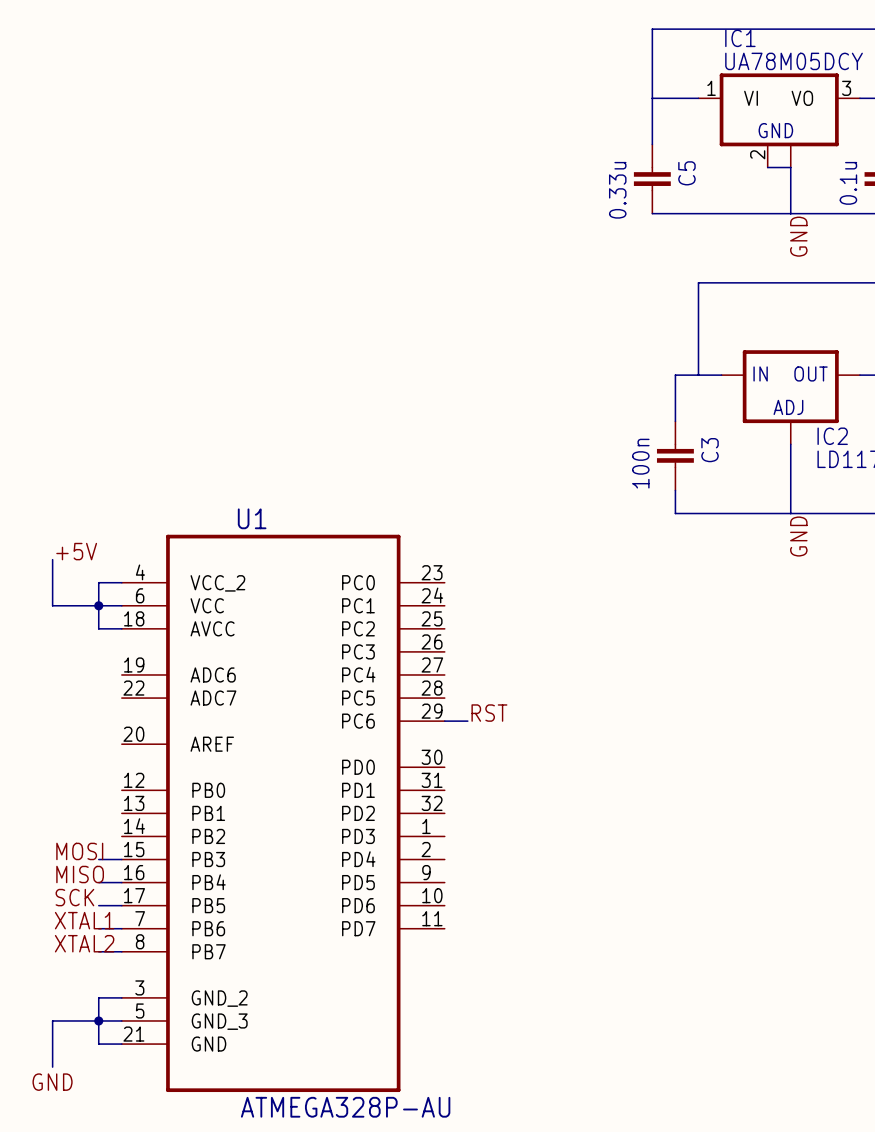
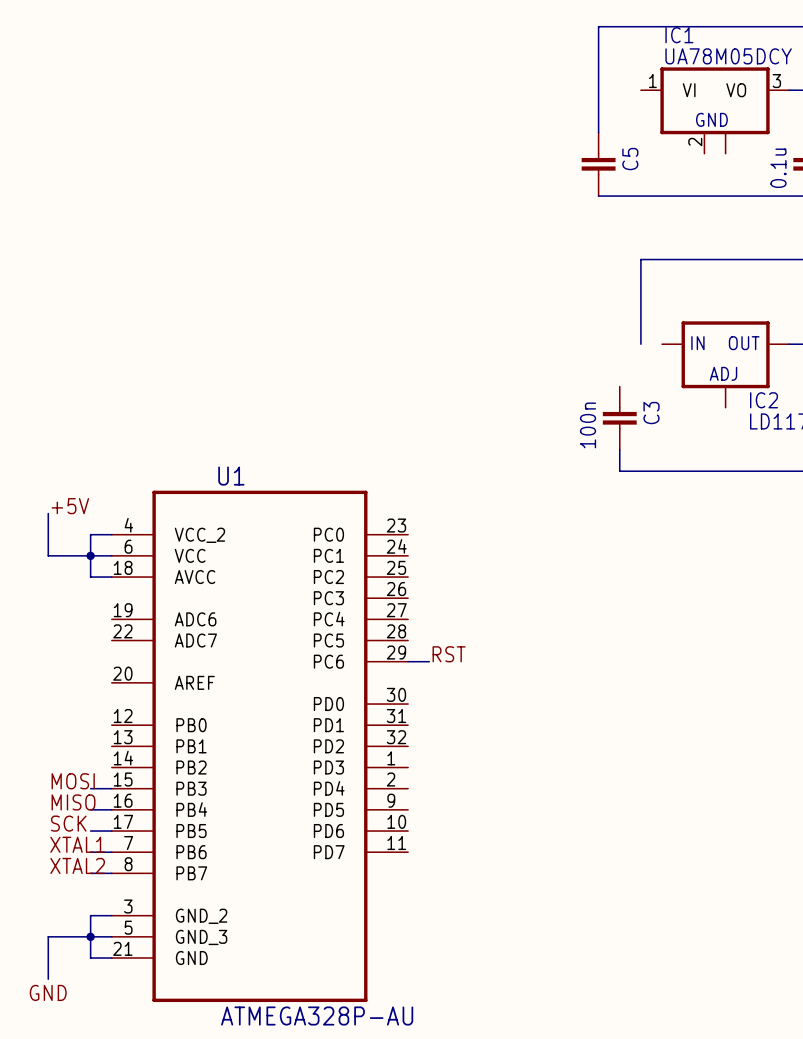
wire: (652, 98) (698, 98) -> none
wire: (767, 167) (790, 167) (790, 213) -> none
C5 value: 0.33u (617, 190) -> none
label: GND (798, 236) -> none
wire: (721, 375) (675, 375) (675, 421) -> none
wire: (790, 444) (790, 513) -> none
label: GND (798, 536) -> none

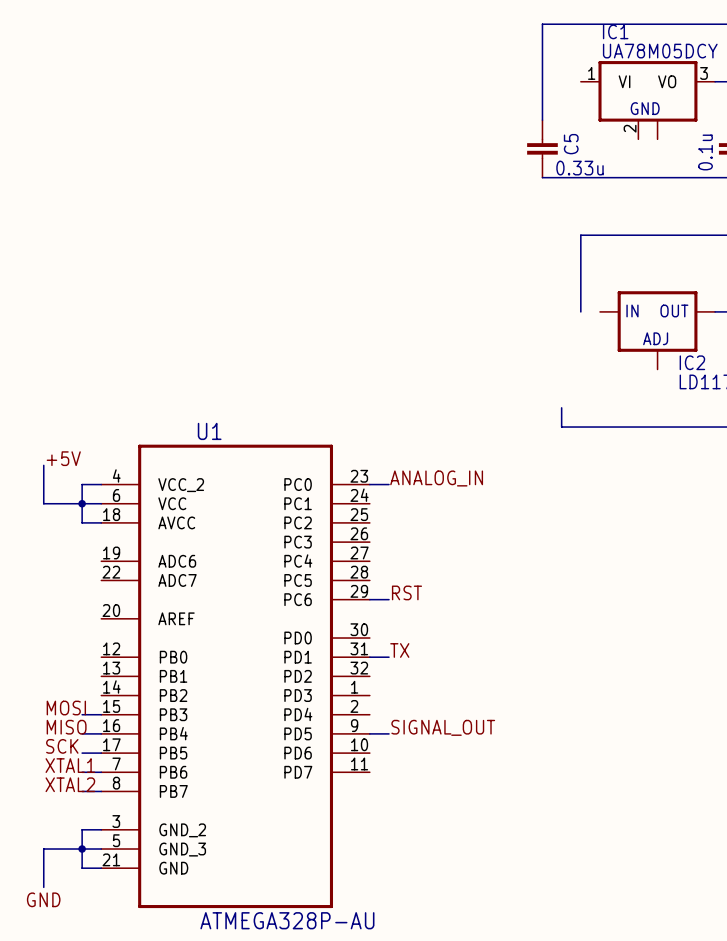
C5 value: none -> 0.33u (580, 168)
C3: 100n (619, 418) -> none
label: none -> ANALOG_IN (436, 478)
wire: none -> (369, 484) (389, 484)
label: none -> TX (399, 650)
wire: none -> (369, 657) (389, 657)
label: none -> SIGNAL_OUT (443, 727)
wire: none -> (369, 733) (389, 733)

